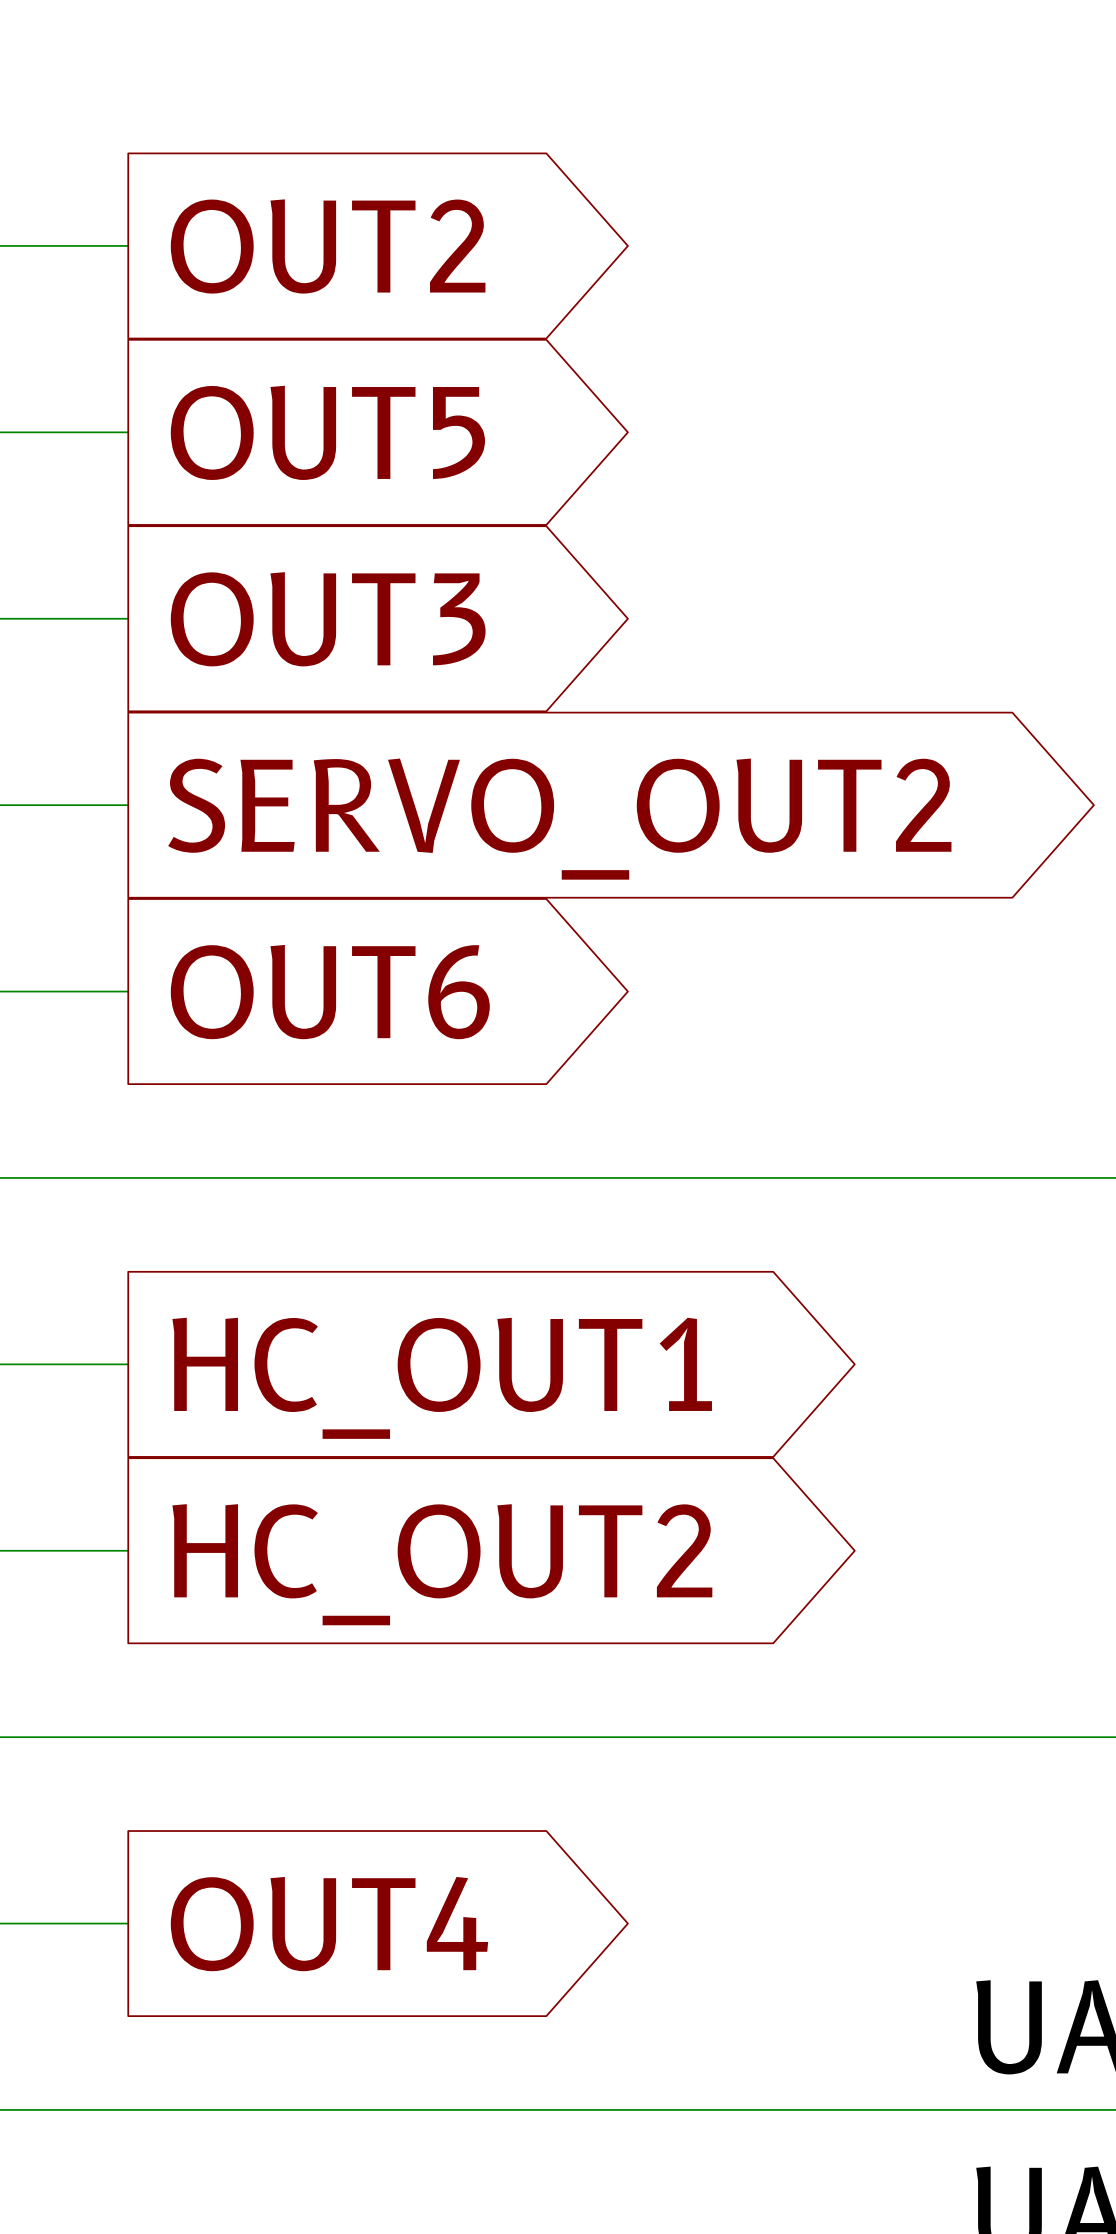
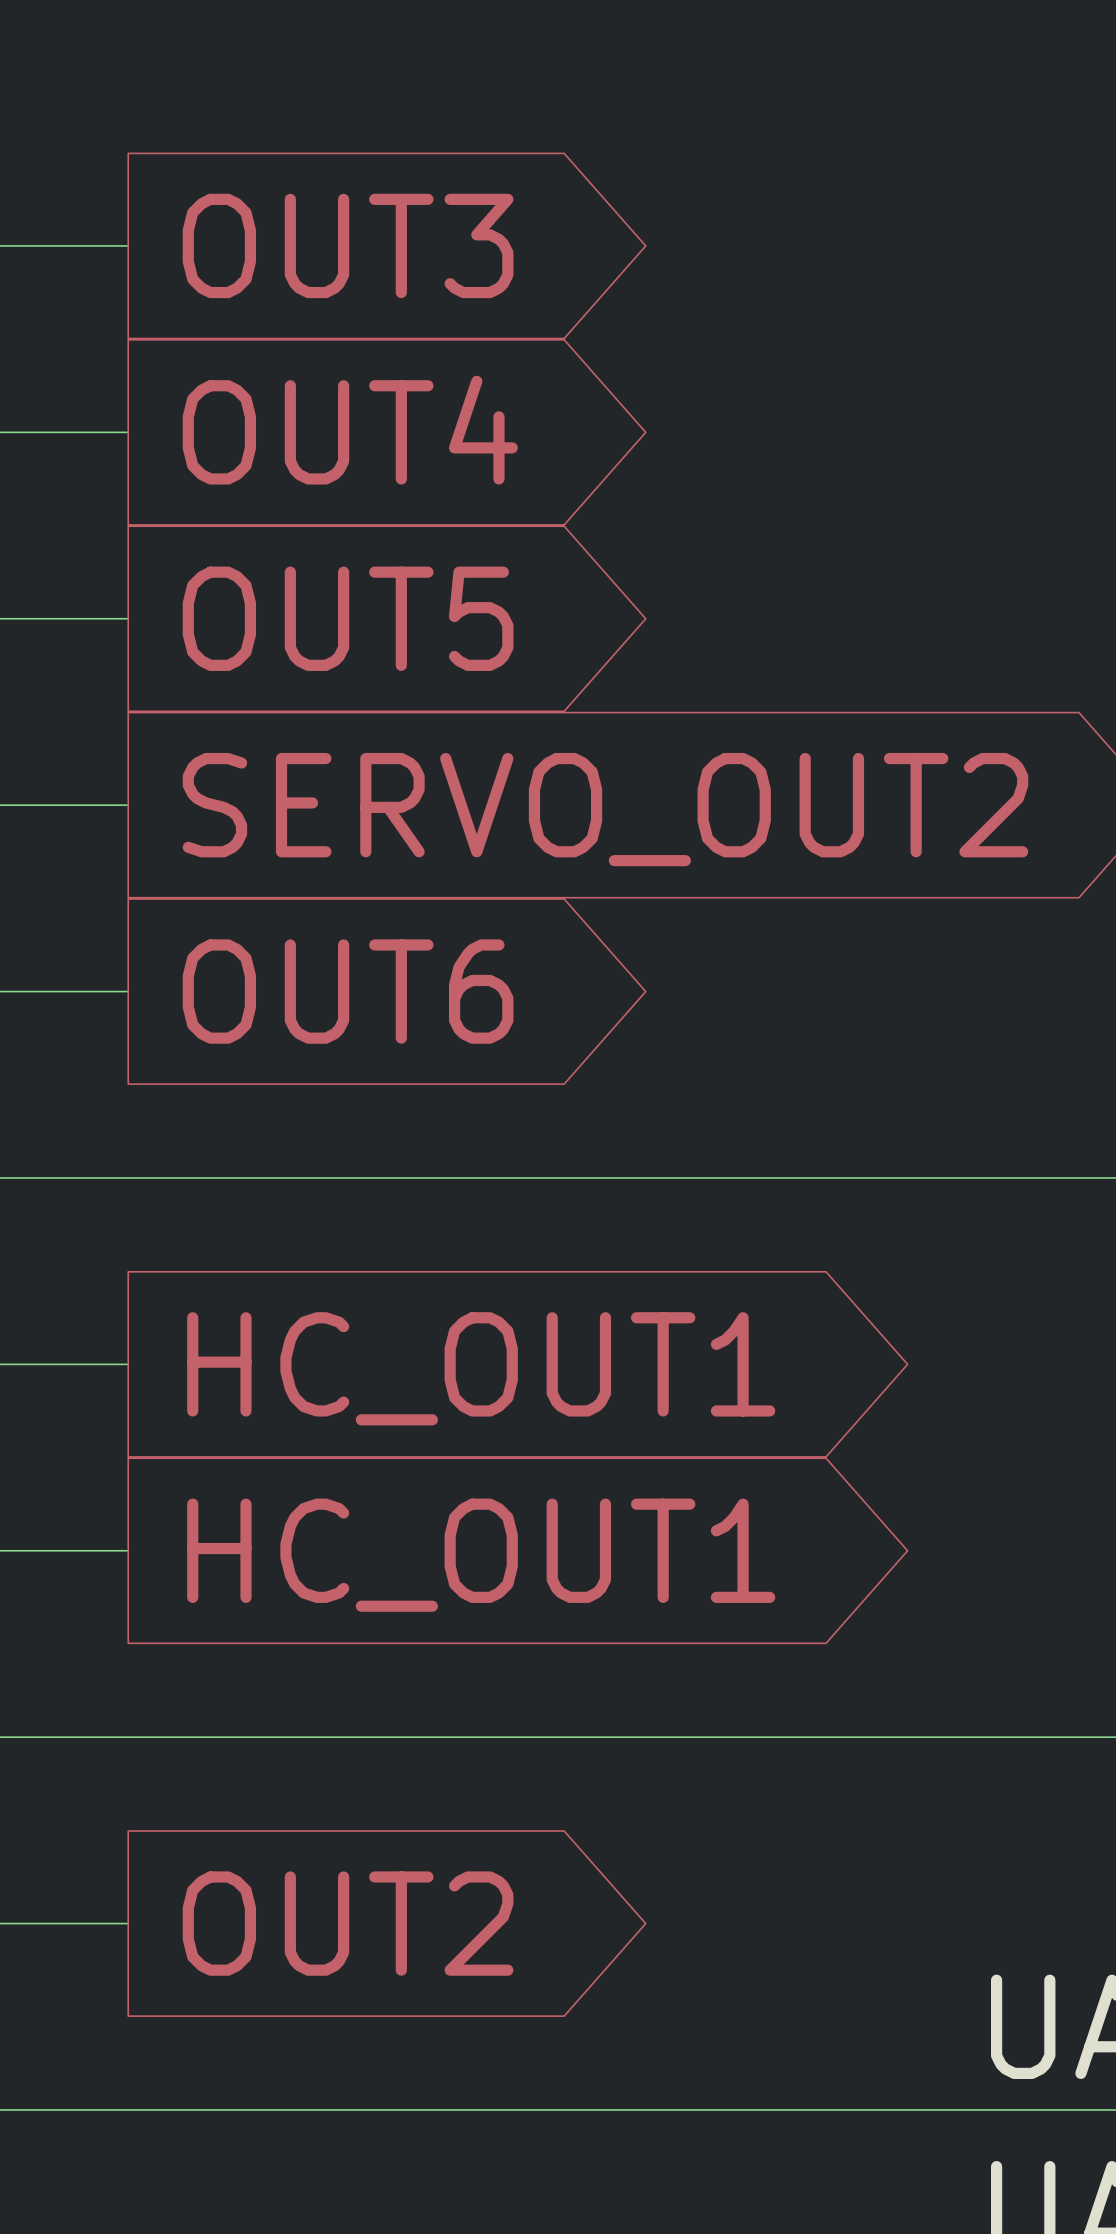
global label: OUT2 (328, 246) -> OUT3 (348, 245)
global label: OUT5 (327, 432) -> OUT4 (350, 430)
global label: OUT3 (328, 619) -> OUT5 (348, 618)
global label: HC_OUT2 (442, 1564) -> HC_OUT1 (481, 1555)
global label: OUT4 (329, 1924) -> OUT2 (348, 1923)

